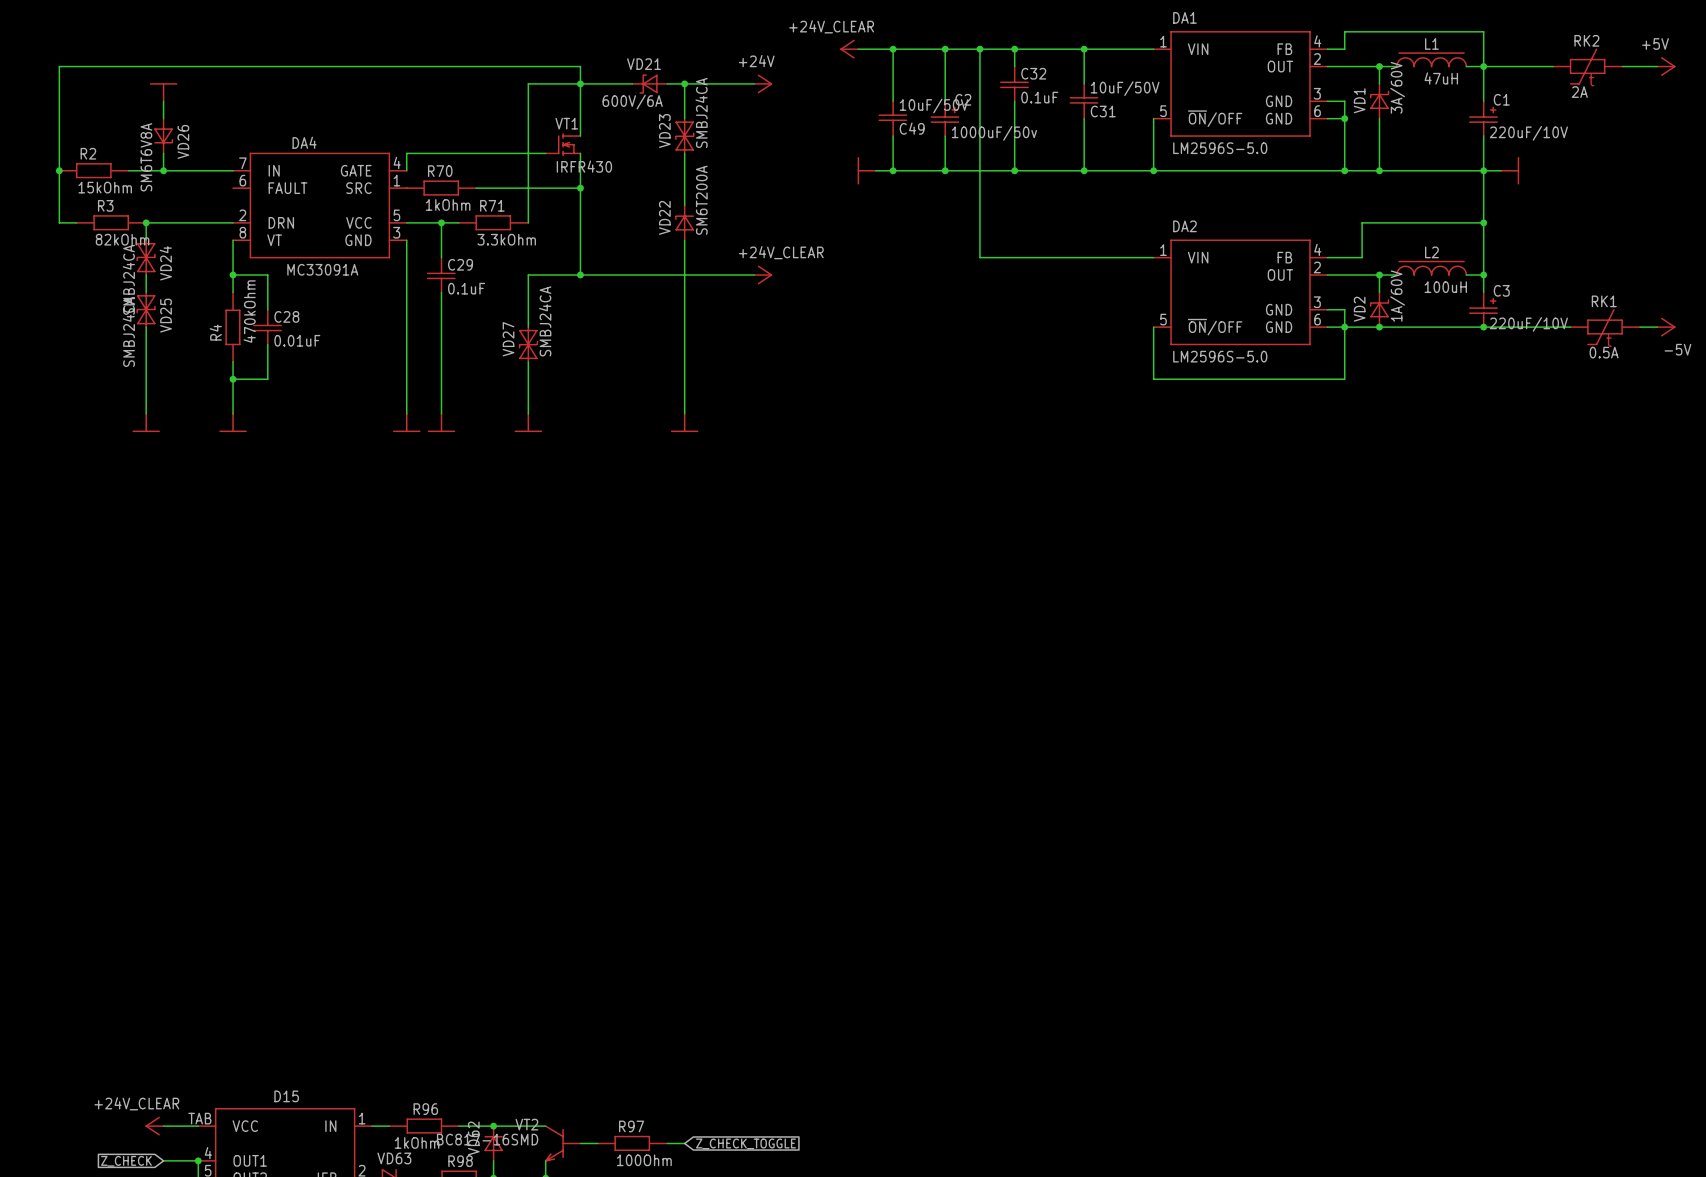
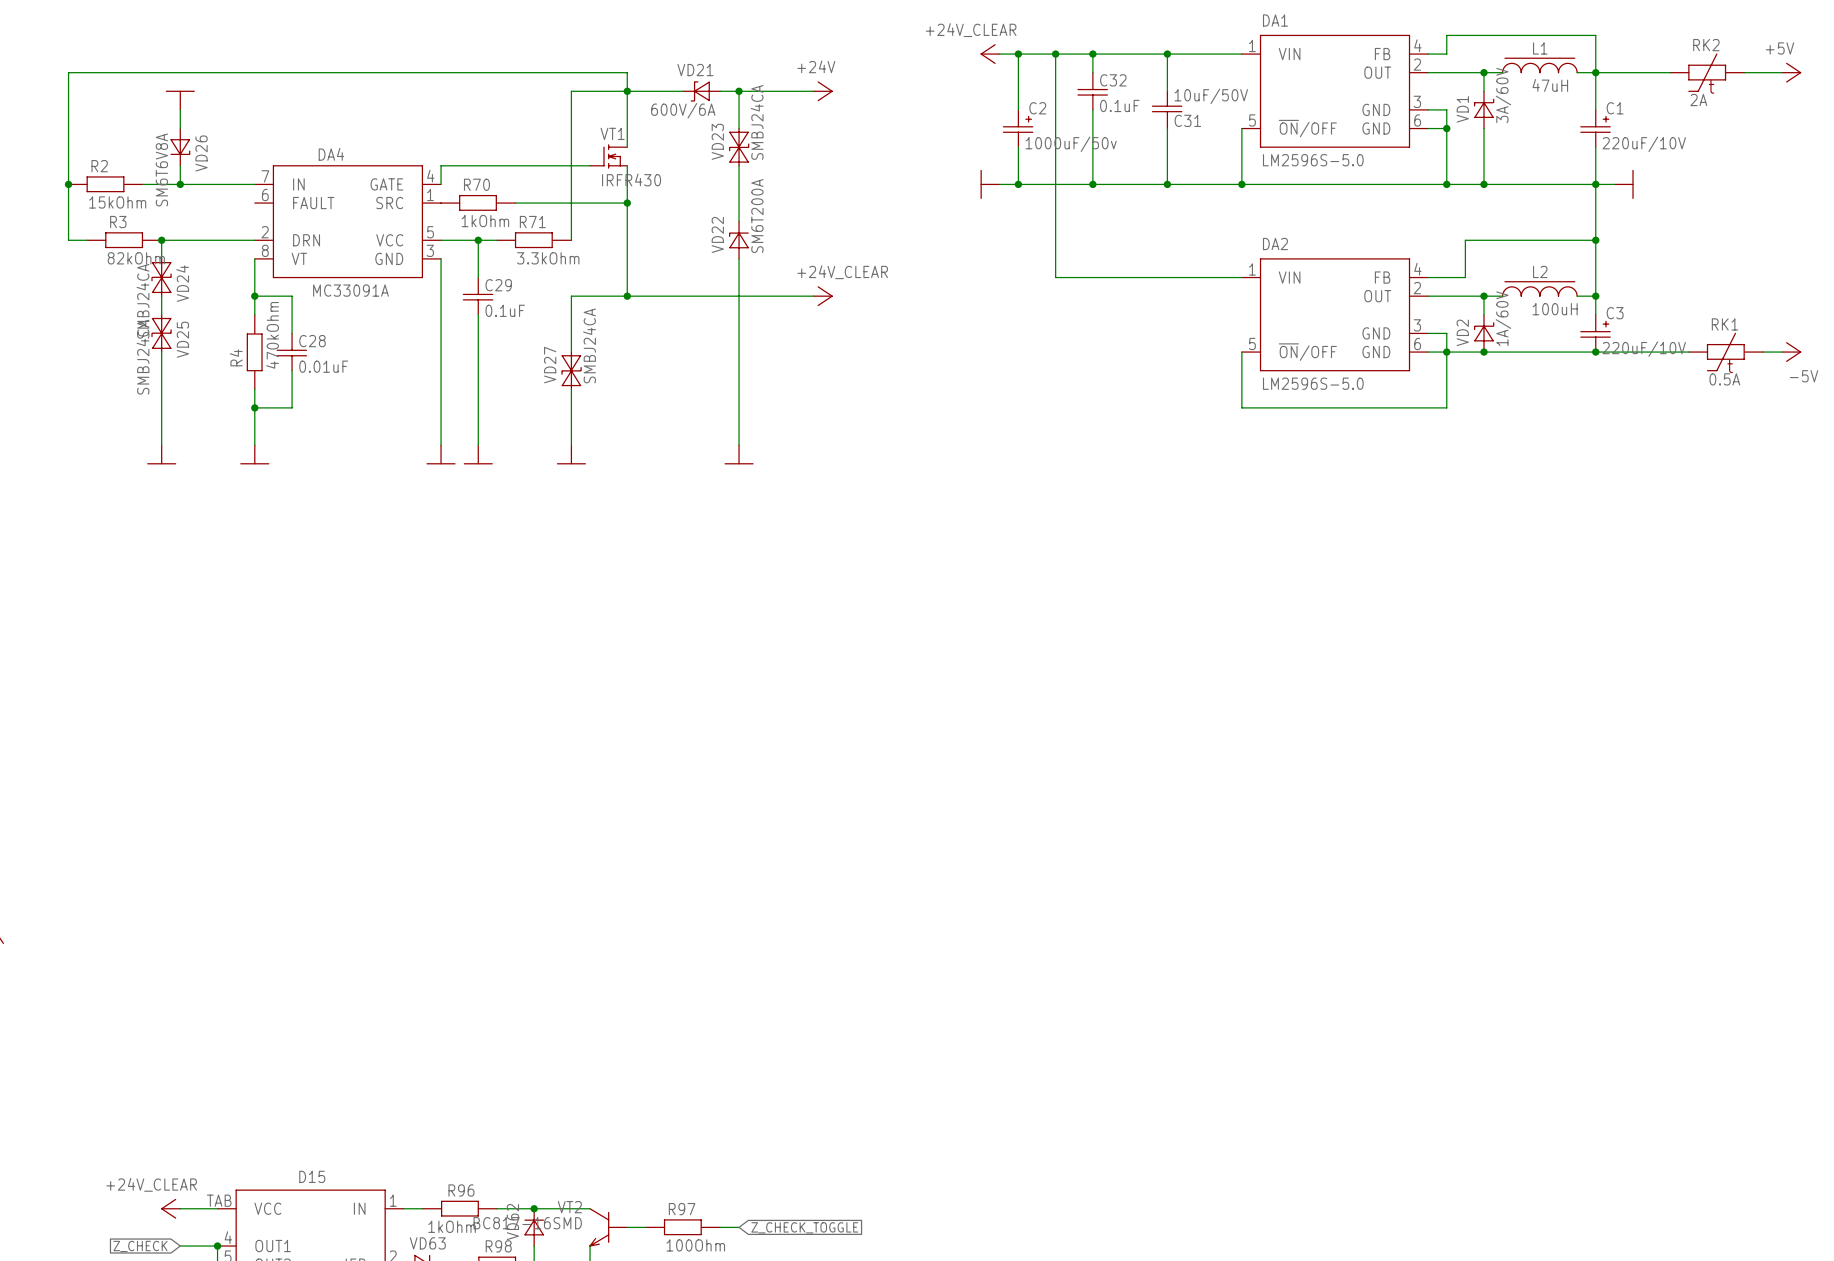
power symbol position: +24V_CLEAR (849, 49) -> +24V_CLEAR (990, 54)
wire: (858, 49) (927, 49) -> none
wire: (893, 49) (893, 101) -> none
junction: (893, 49) -> none
C49: 10uF/50V (892, 118) -> none
wire: (893, 136) (893, 170) -> none
power symbol position: (866, 170) -> (990, 184)
wire: (875, 170) (927, 170) -> none
junction: (893, 170) -> none

